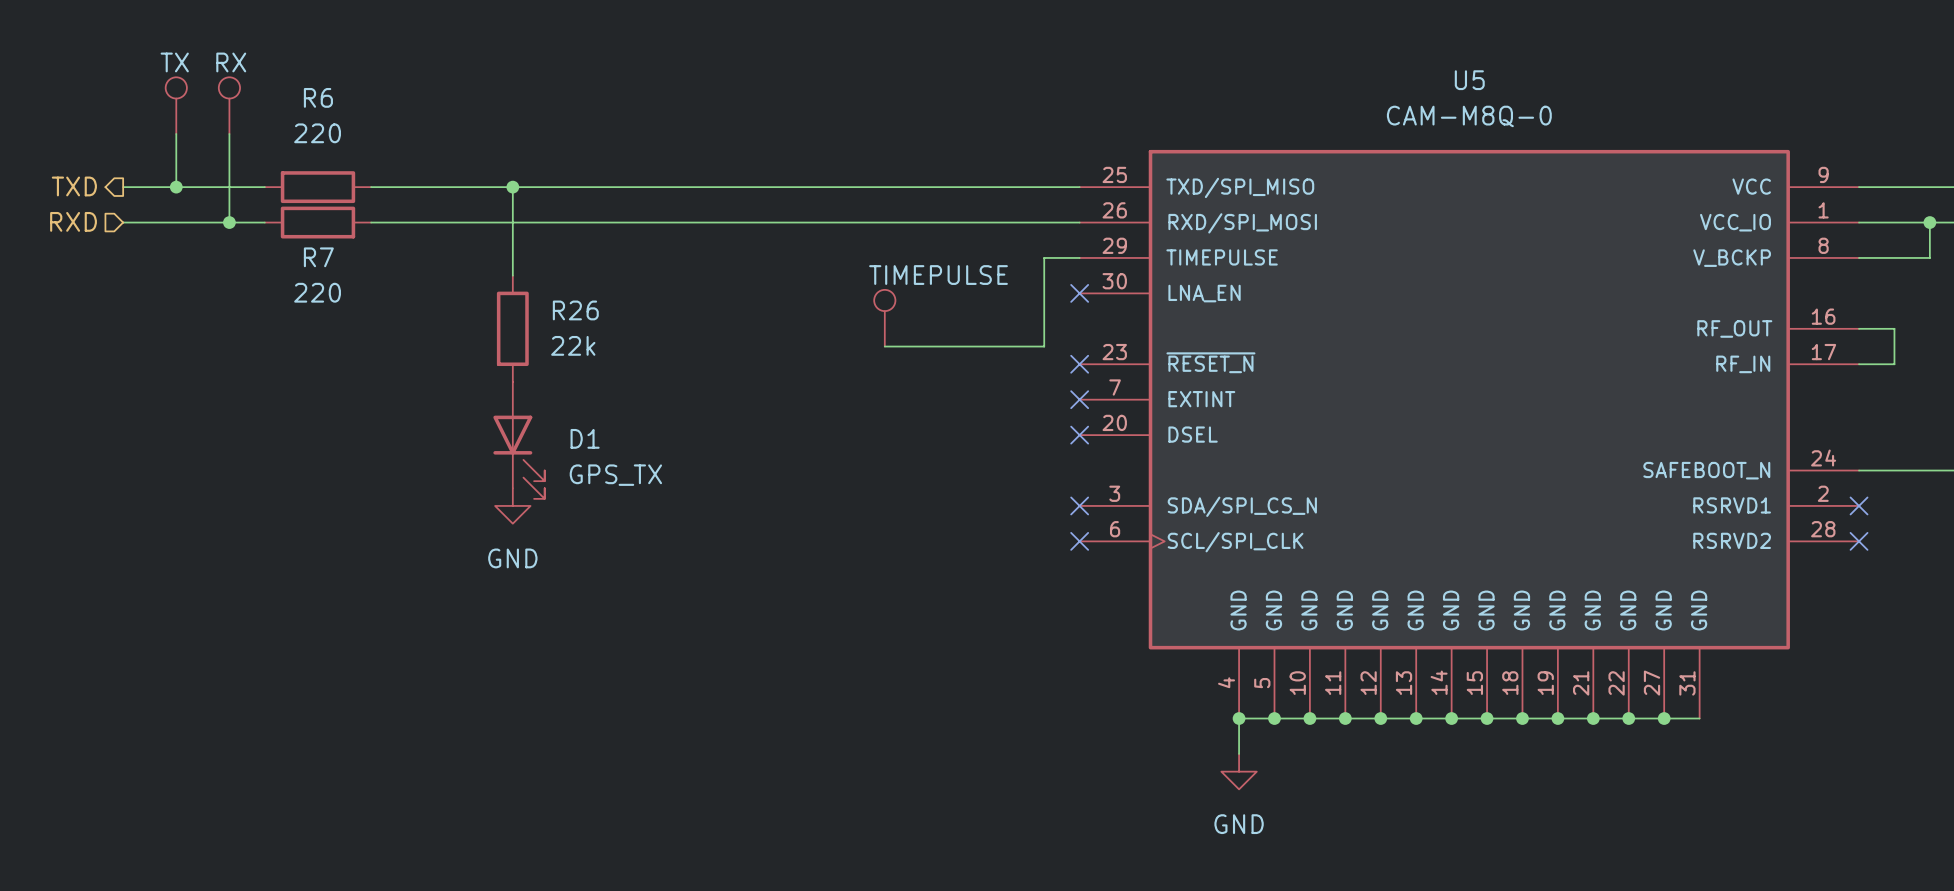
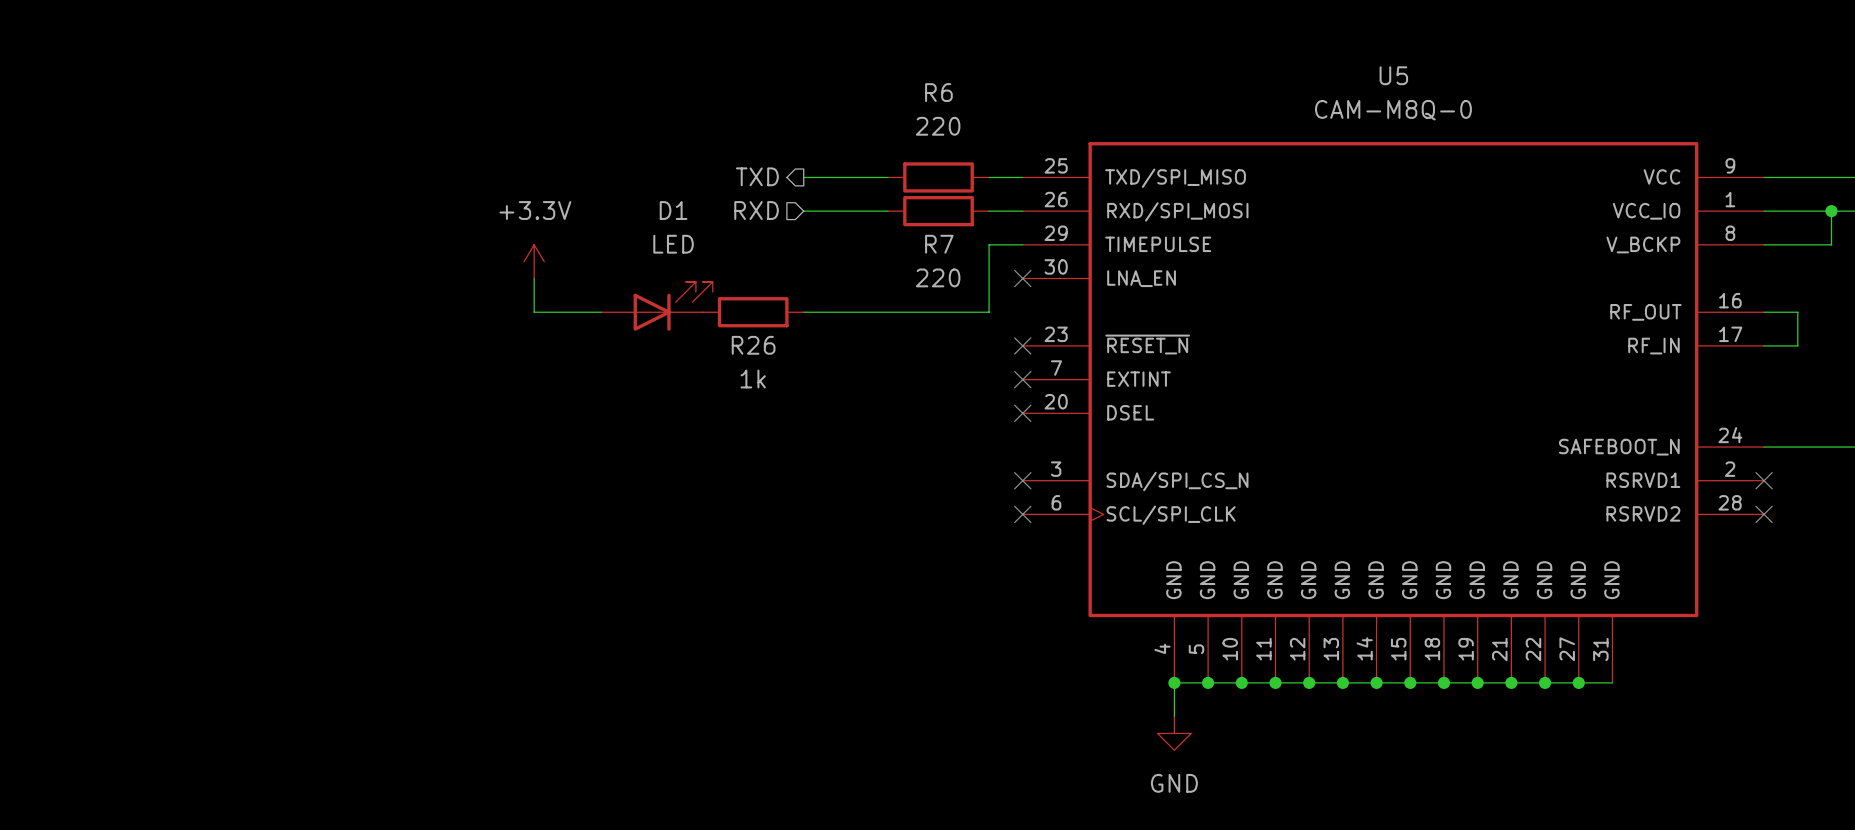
part: TX (176, 105) -> none
part: RX (229, 105) -> none
wire: (176, 133) (176, 187) -> none
wire: (229, 133) (229, 222) -> none
hierarchical label: TXD (74, 186) -> none
hierarchical label: none -> TXD (757, 176)
wire: (123, 187) (264, 187) -> none
junction: (176, 187) -> none
R6 position: (317, 187) -> (938, 177)
wire: (371, 187) (849, 187) -> none
wire: (512, 187) (512, 275) -> none
junction: (512, 187) -> none
wire: (937, 187) (1044, 187) -> none
hierarchical label: RXD (73, 221) -> none
hierarchical label: none -> RXD (756, 210)
wire: (123, 222) (264, 222) -> none
junction: (229, 222) -> none
R7 position: (317, 222) -> (938, 211)
wire: (371, 222) (849, 222) -> none
wire: (937, 222) (1044, 222) -> none
power symbol: none -> +3.3V (534, 261)
wire: none -> (534, 278) (534, 312) (601, 312)
R26 name position: R26 (575, 310) -> R26 (753, 345)
part: TIMEPULSE (884, 318) -> none
R26 rotation: 0° (512, 328) -> 90° clockwise (753, 312)
R26 position: (512, 328) -> (753, 312)
wire: (1044, 328) (1044, 346) (884, 346) -> (989, 312) (803, 312)
R26 value: 22k (573, 345) -> 1k (753, 379)
D1 name position: D1 (585, 438) -> D1 (673, 210)
D1 position: (519, 440) -> (657, 306)
D1 rotation: 0° (519, 457) -> 90° counterclockwise (673, 306)
D1 value: GPS_TX (615, 475) -> LED (673, 244)
power symbol: GND (512, 505) -> none

